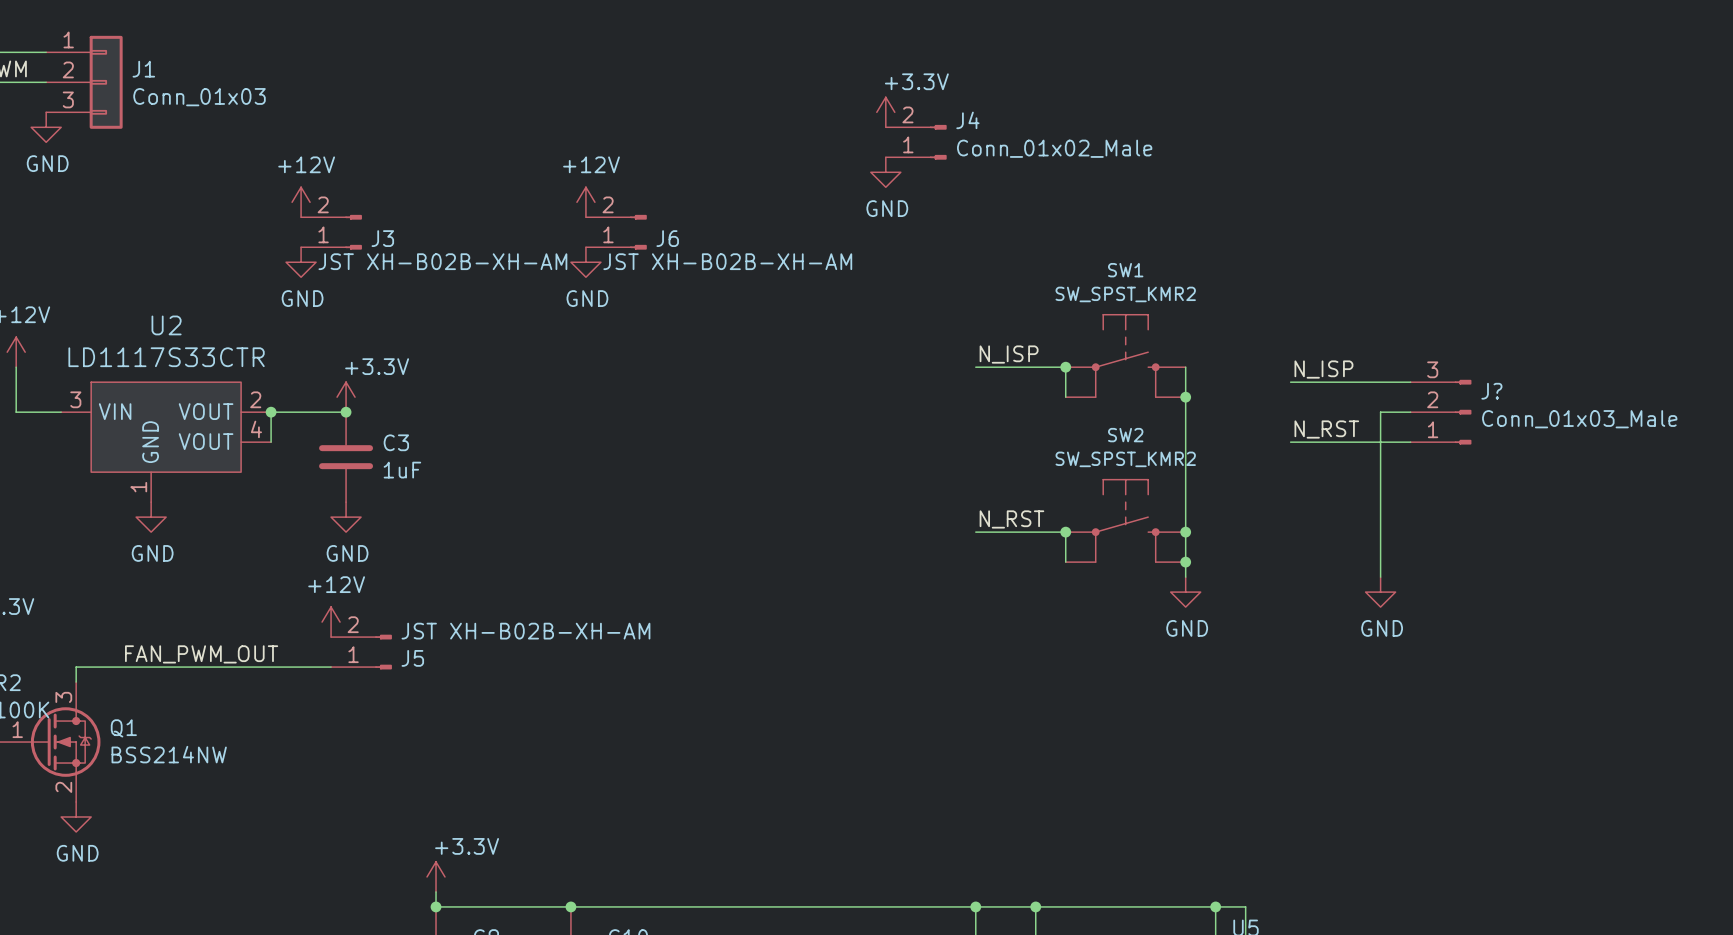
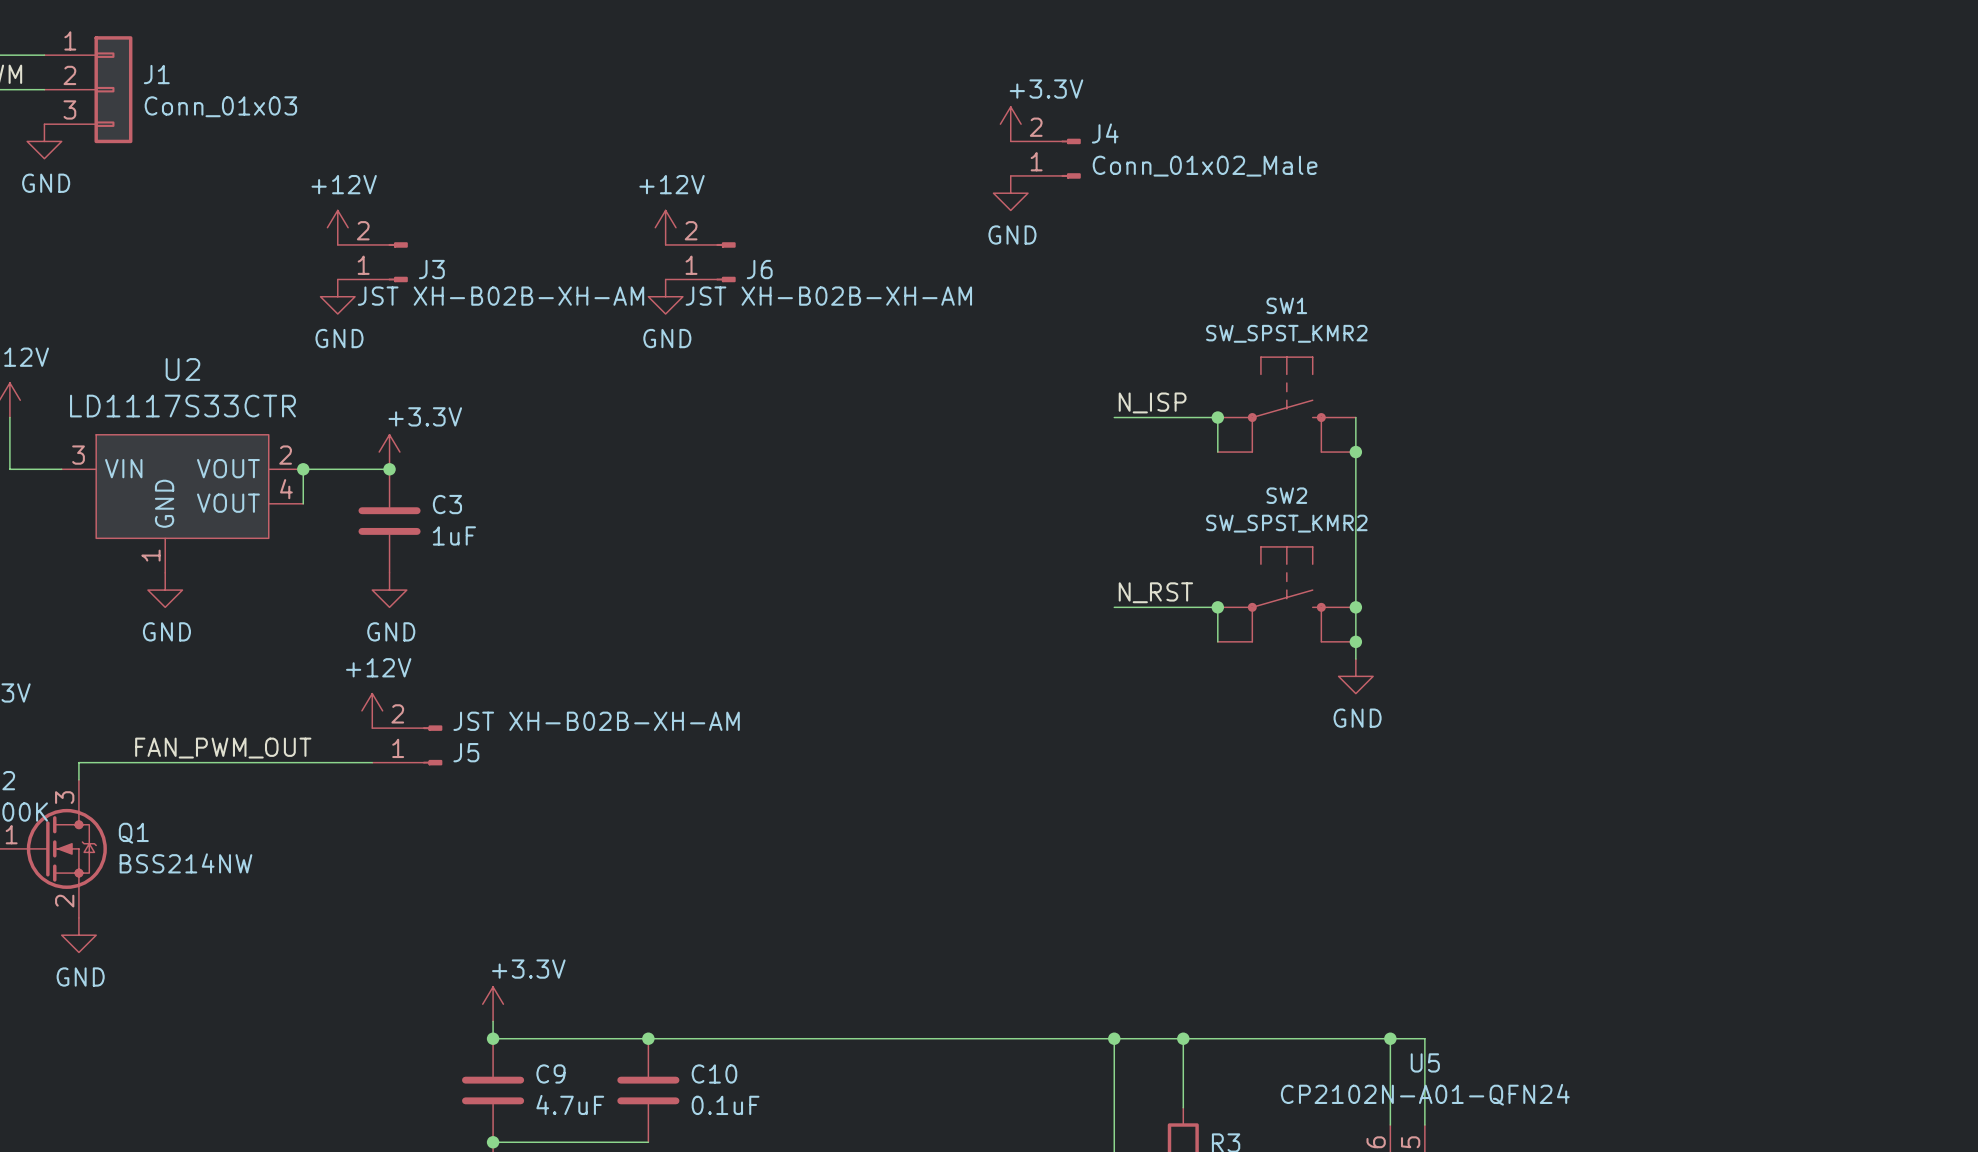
label: N_ISP (1323, 369) -> none
wire: (1290, 382) (1410, 382) -> none
wire: (1410, 412) (1380, 412) (1380, 577) -> none
J?: Conn_01x03_Male (1441, 412) -> none
label: N_RST (1326, 429) -> none
wire: (1290, 442) (1410, 442) -> none
power symbol: GND (1380, 592) -> none

